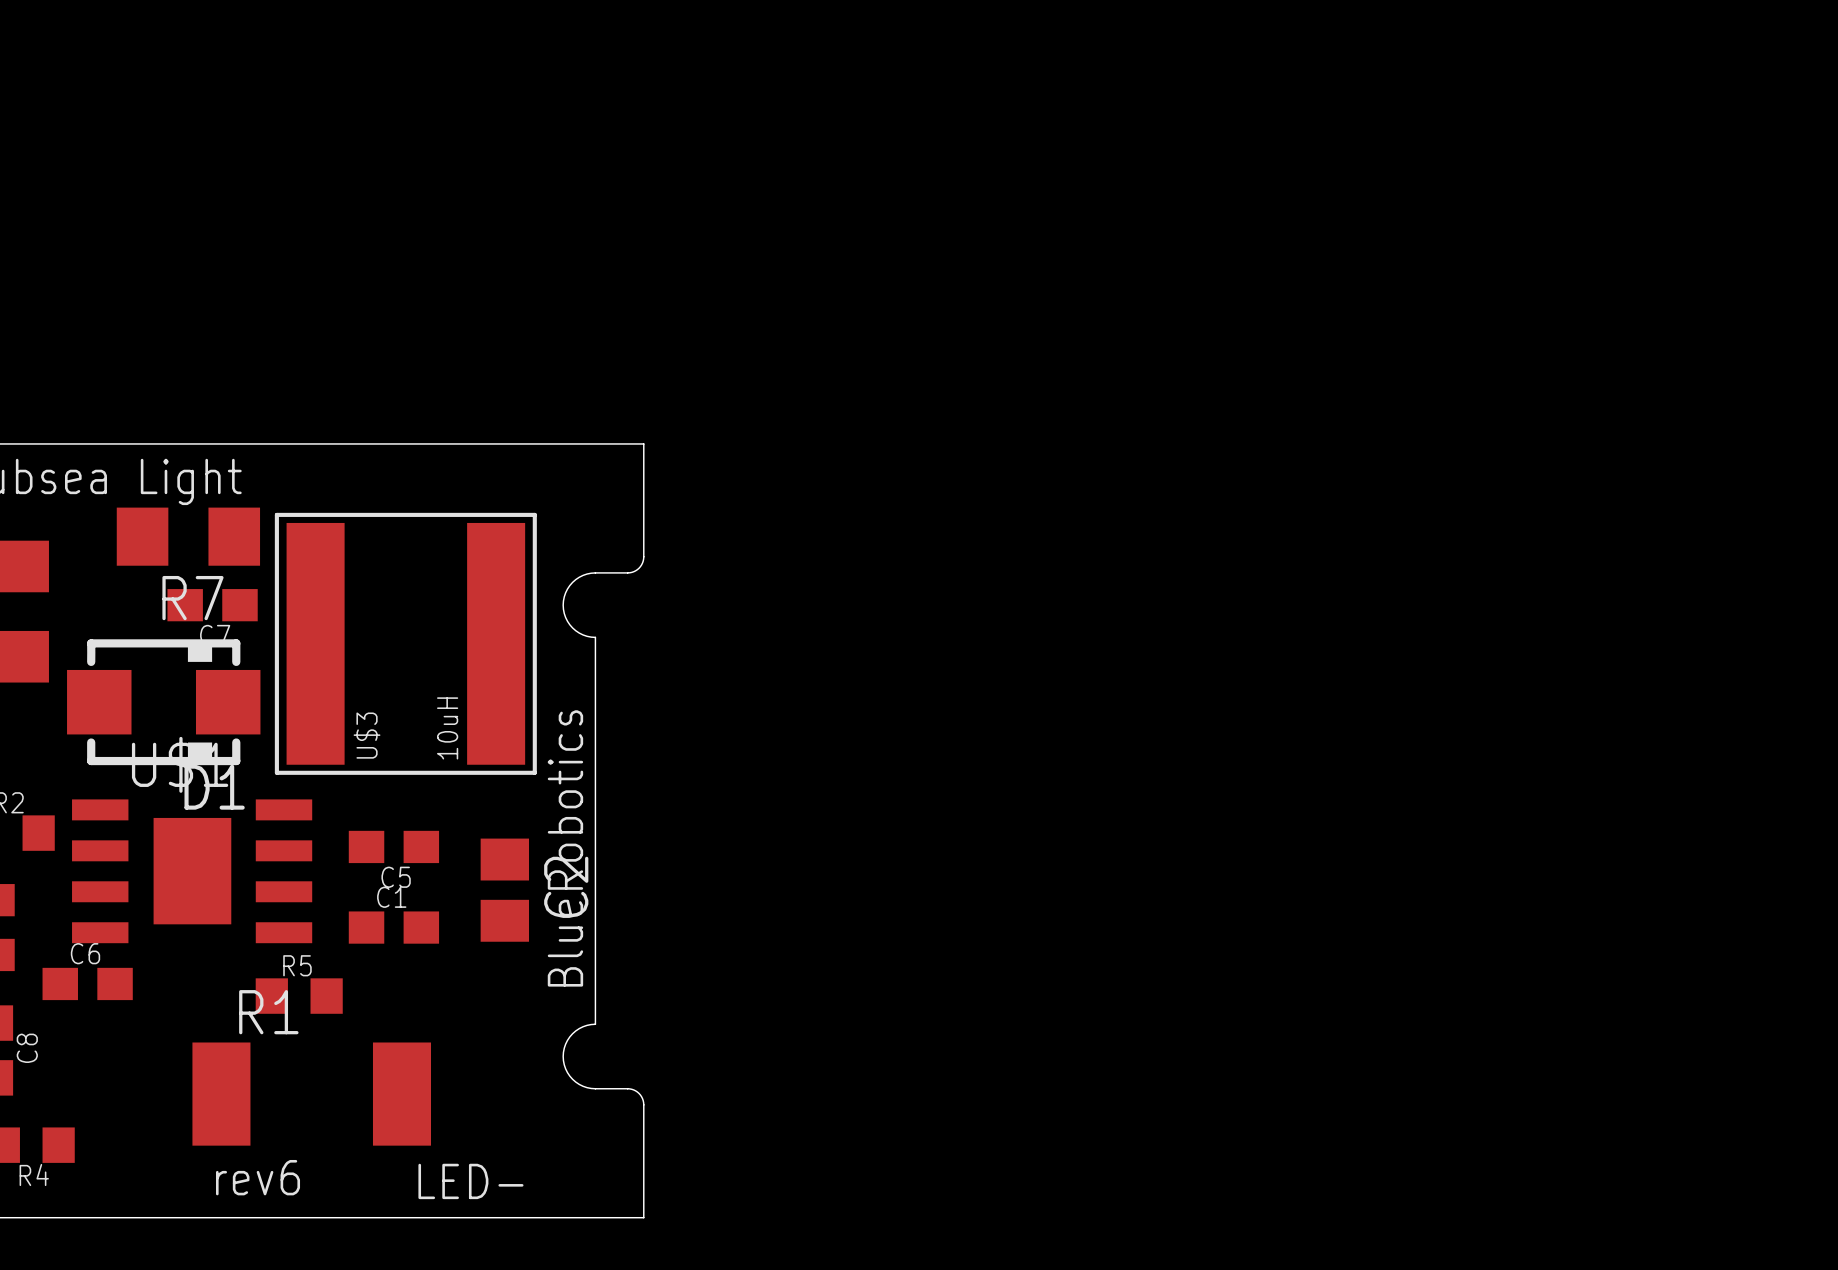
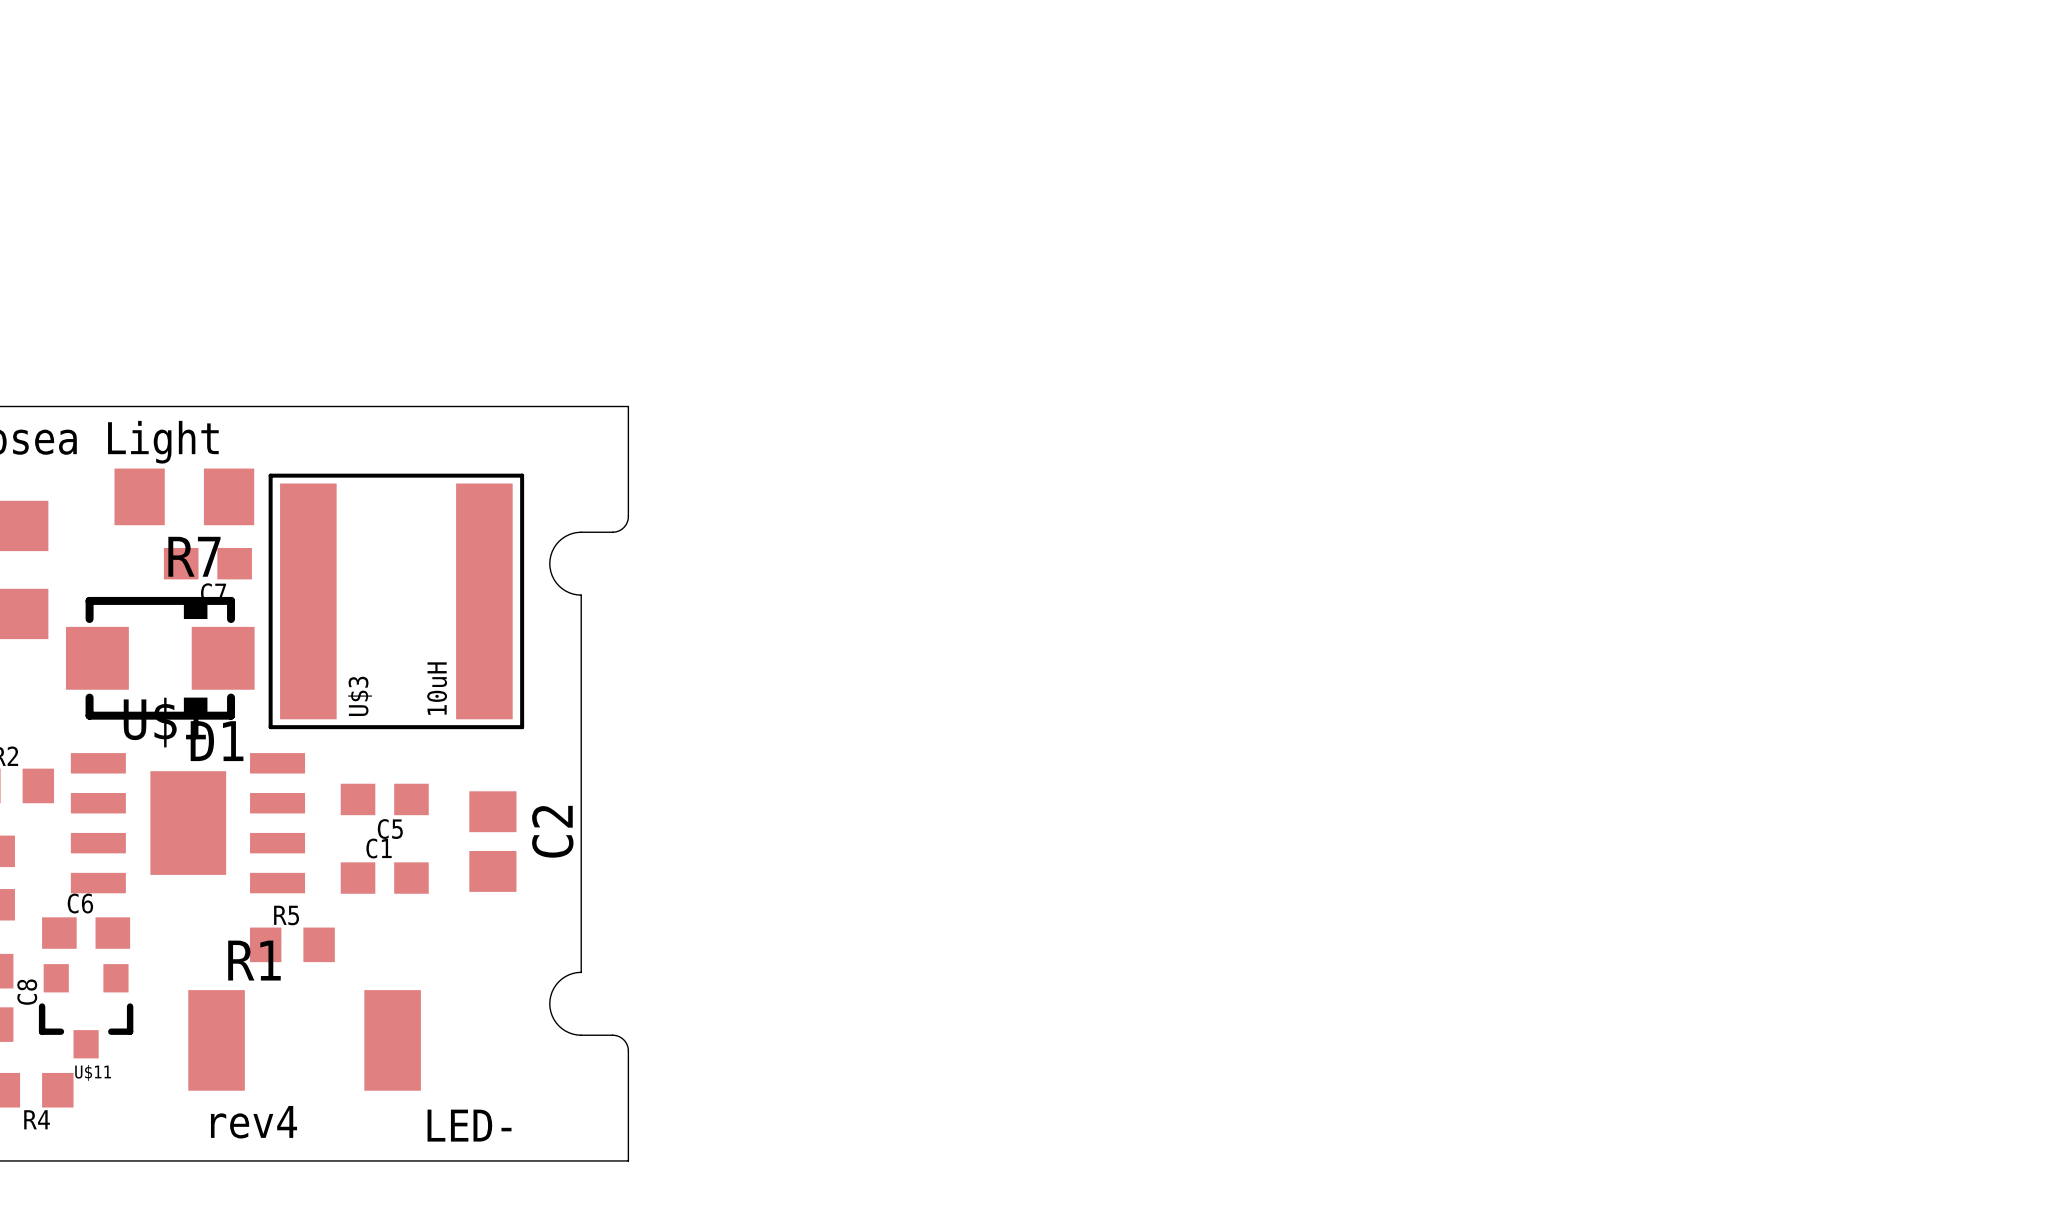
text: BlueRobotics (565, 848) -> none
U$11: none -> (86, 1011)
text: rev6 (258, 1177) -> rev4 (254, 1122)

